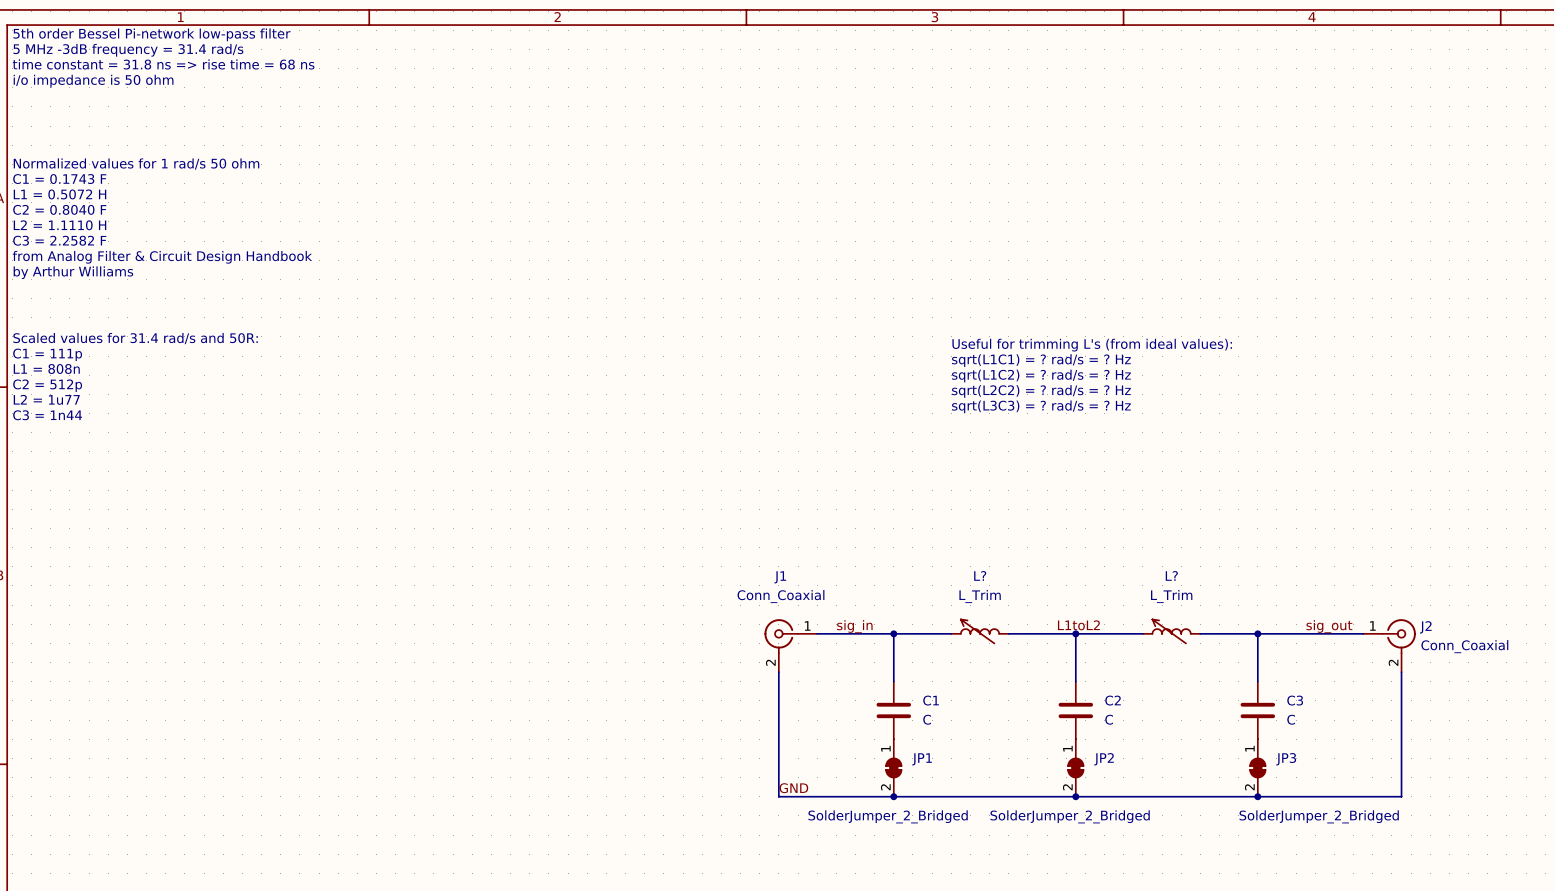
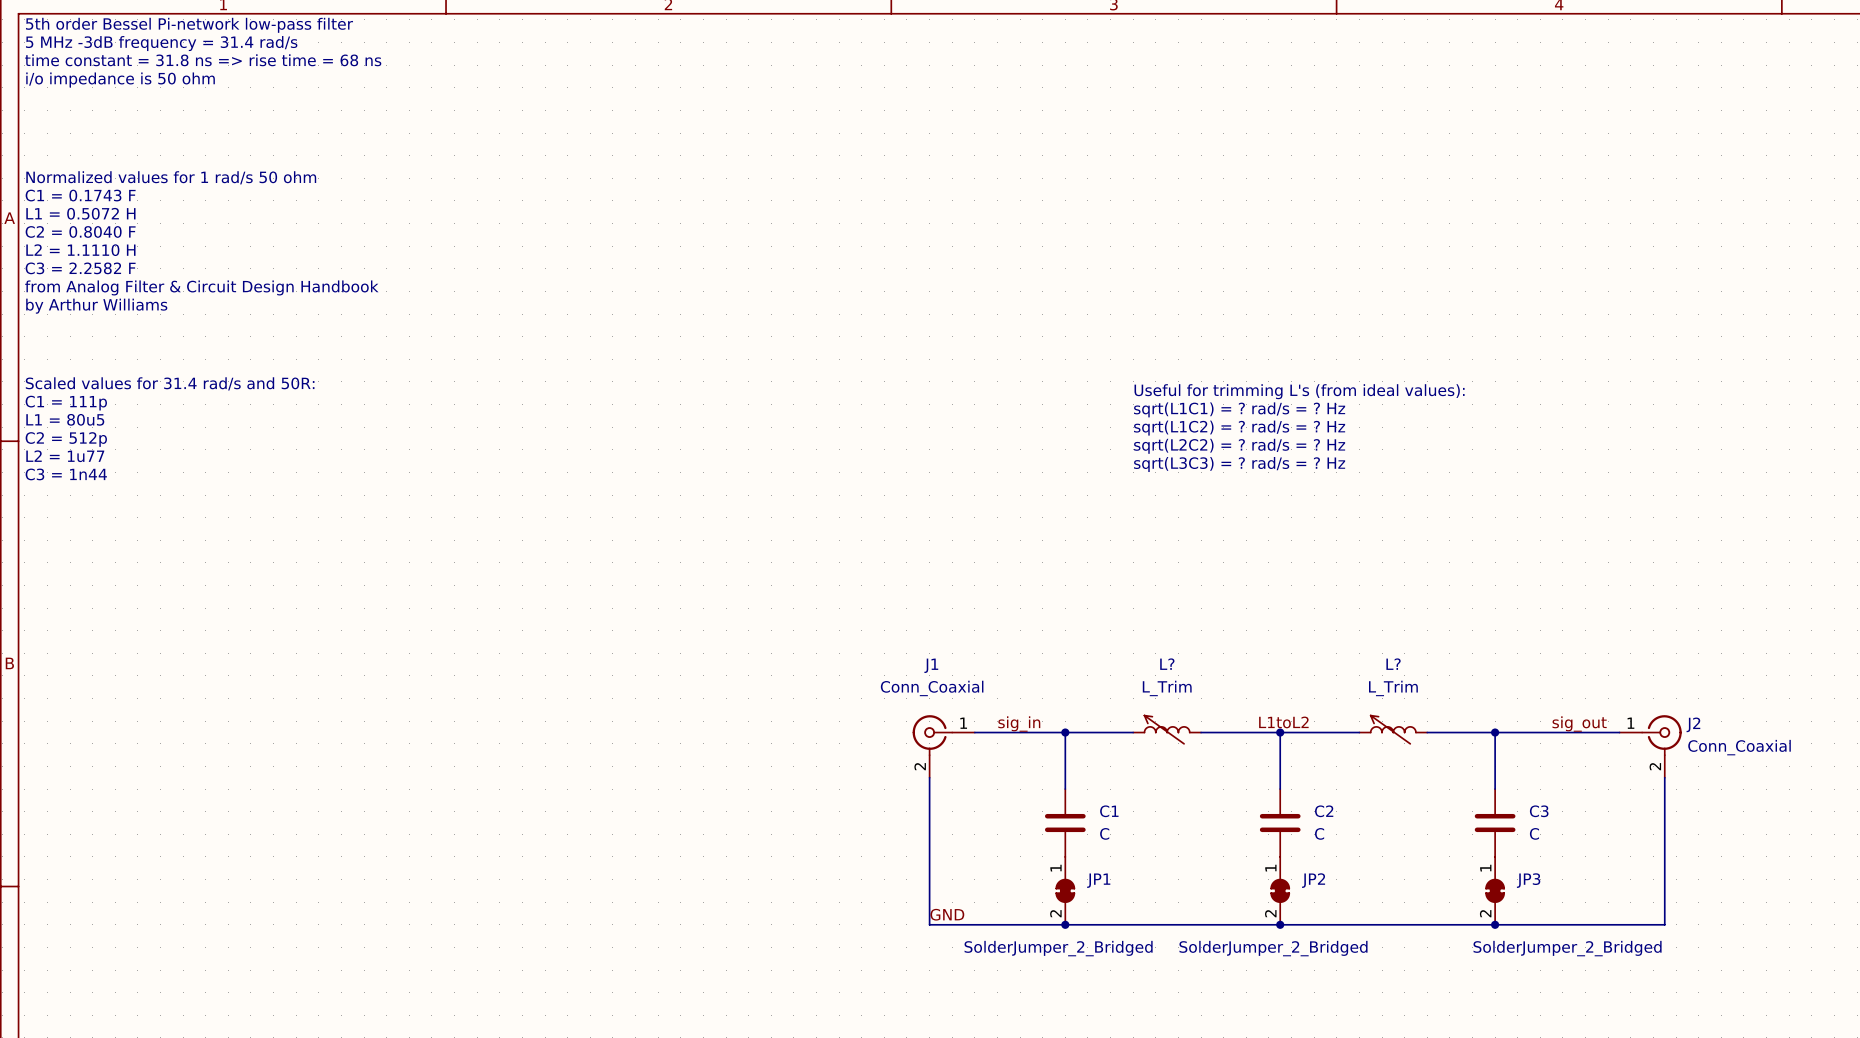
text: L1 = 808n (46, 368) -> L1 = 80u5 (65, 419)

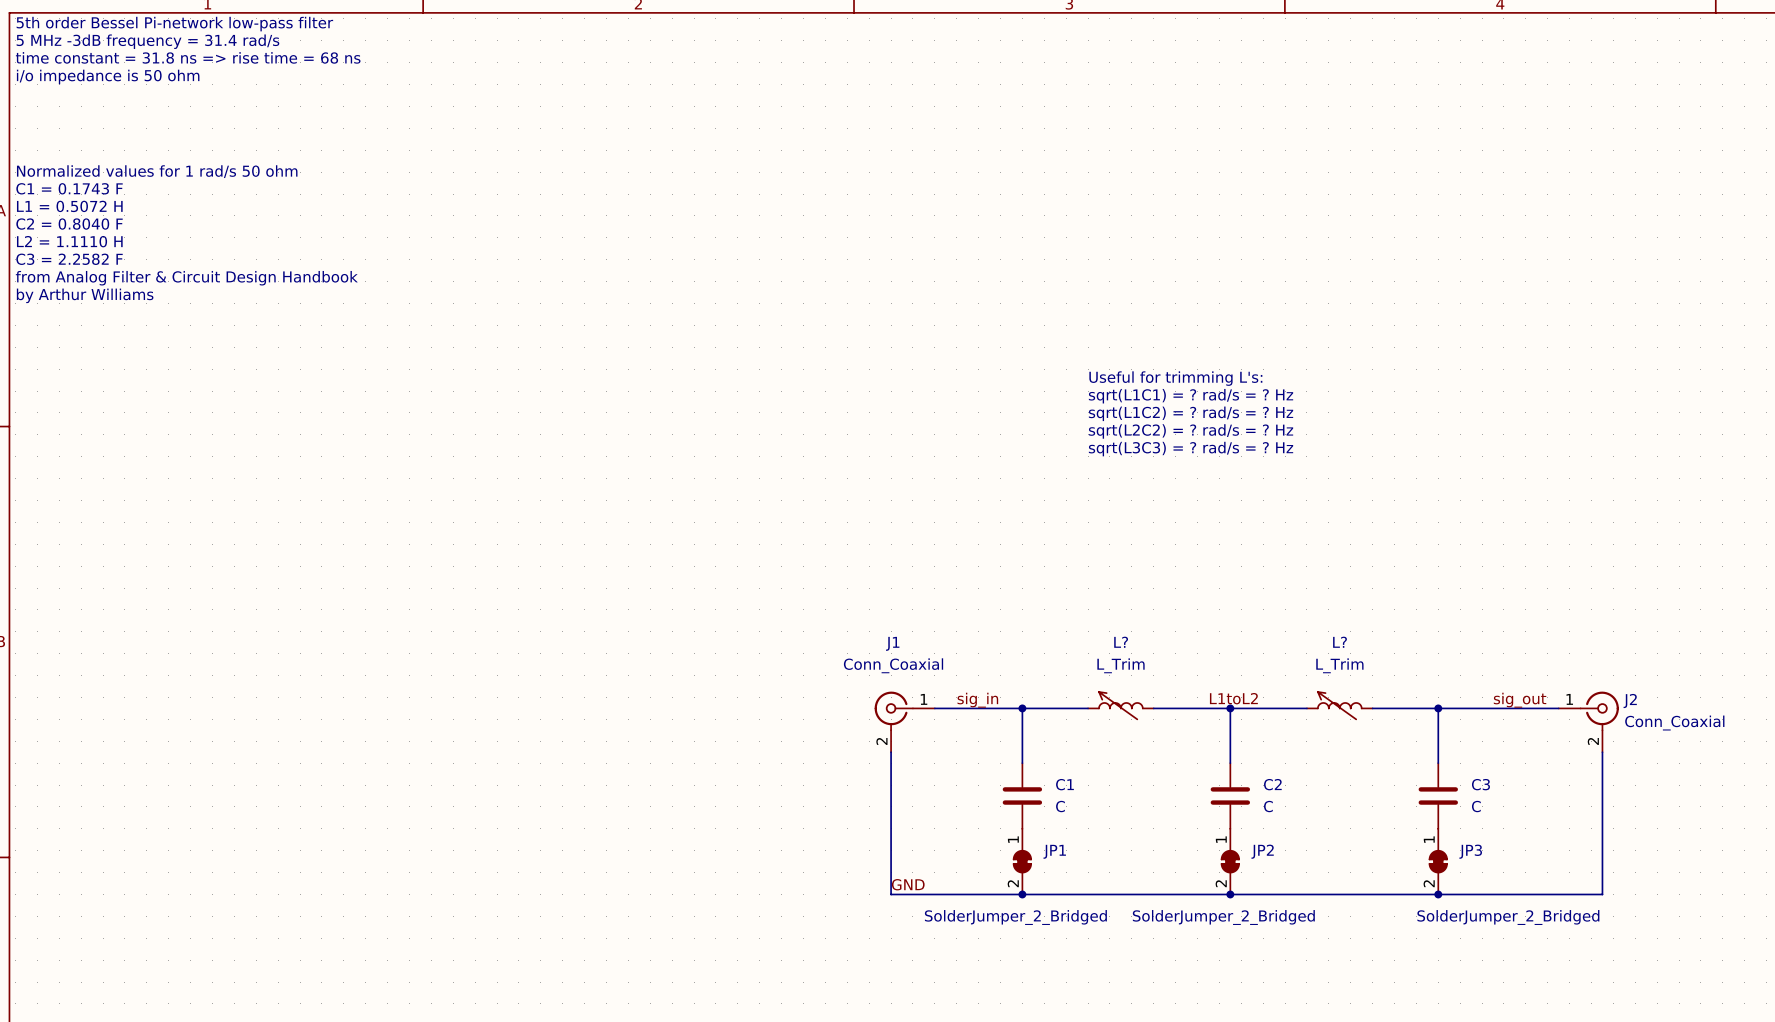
text: Scaled values for 31.4 rad/s and 50R: (170, 383) -> none
text: Useful for trimming L's (from ideal values): (1299, 391) -> Useful for trimming L's: (1175, 378)
text: C1 = 111p (66, 403) -> none
text: L1 = 80u5 (65, 419) -> none
text: C2 = 512p (66, 439) -> none
text: L2 = 1u77 (65, 456) -> none
text: C3 = 1n44 (66, 474) -> none

